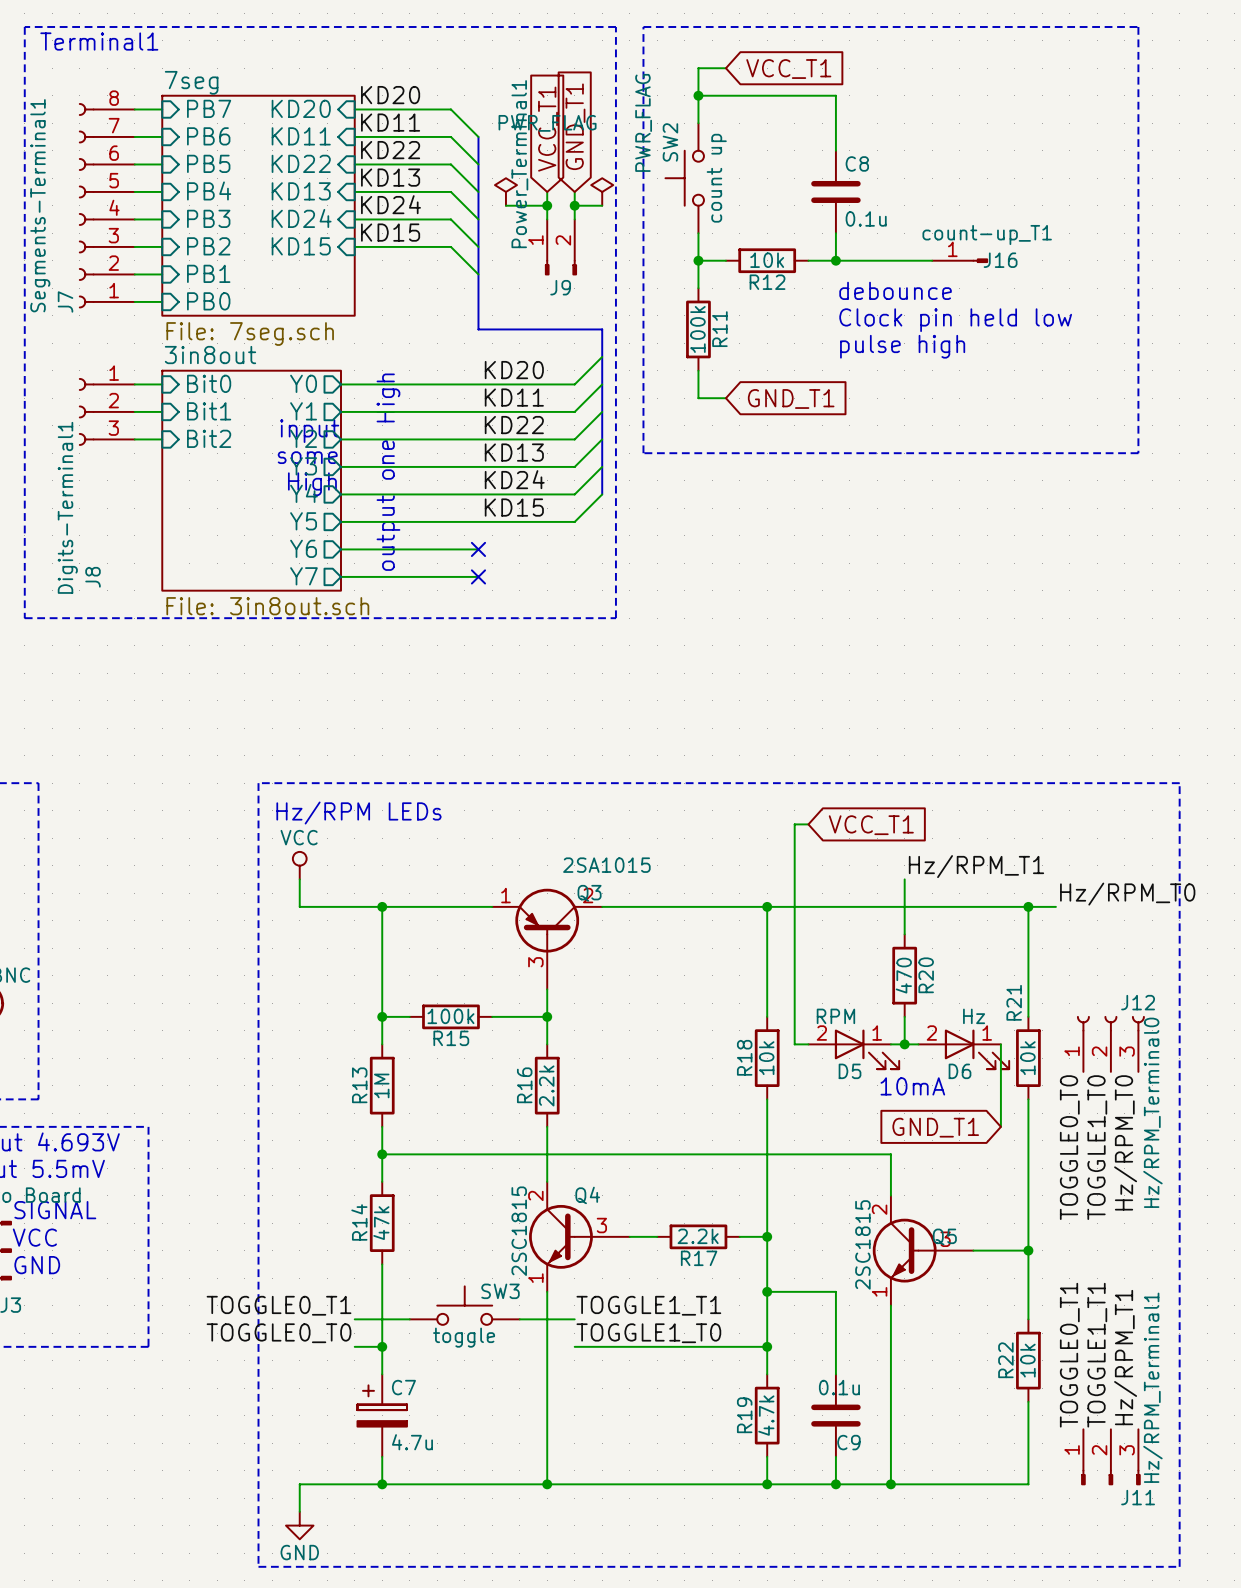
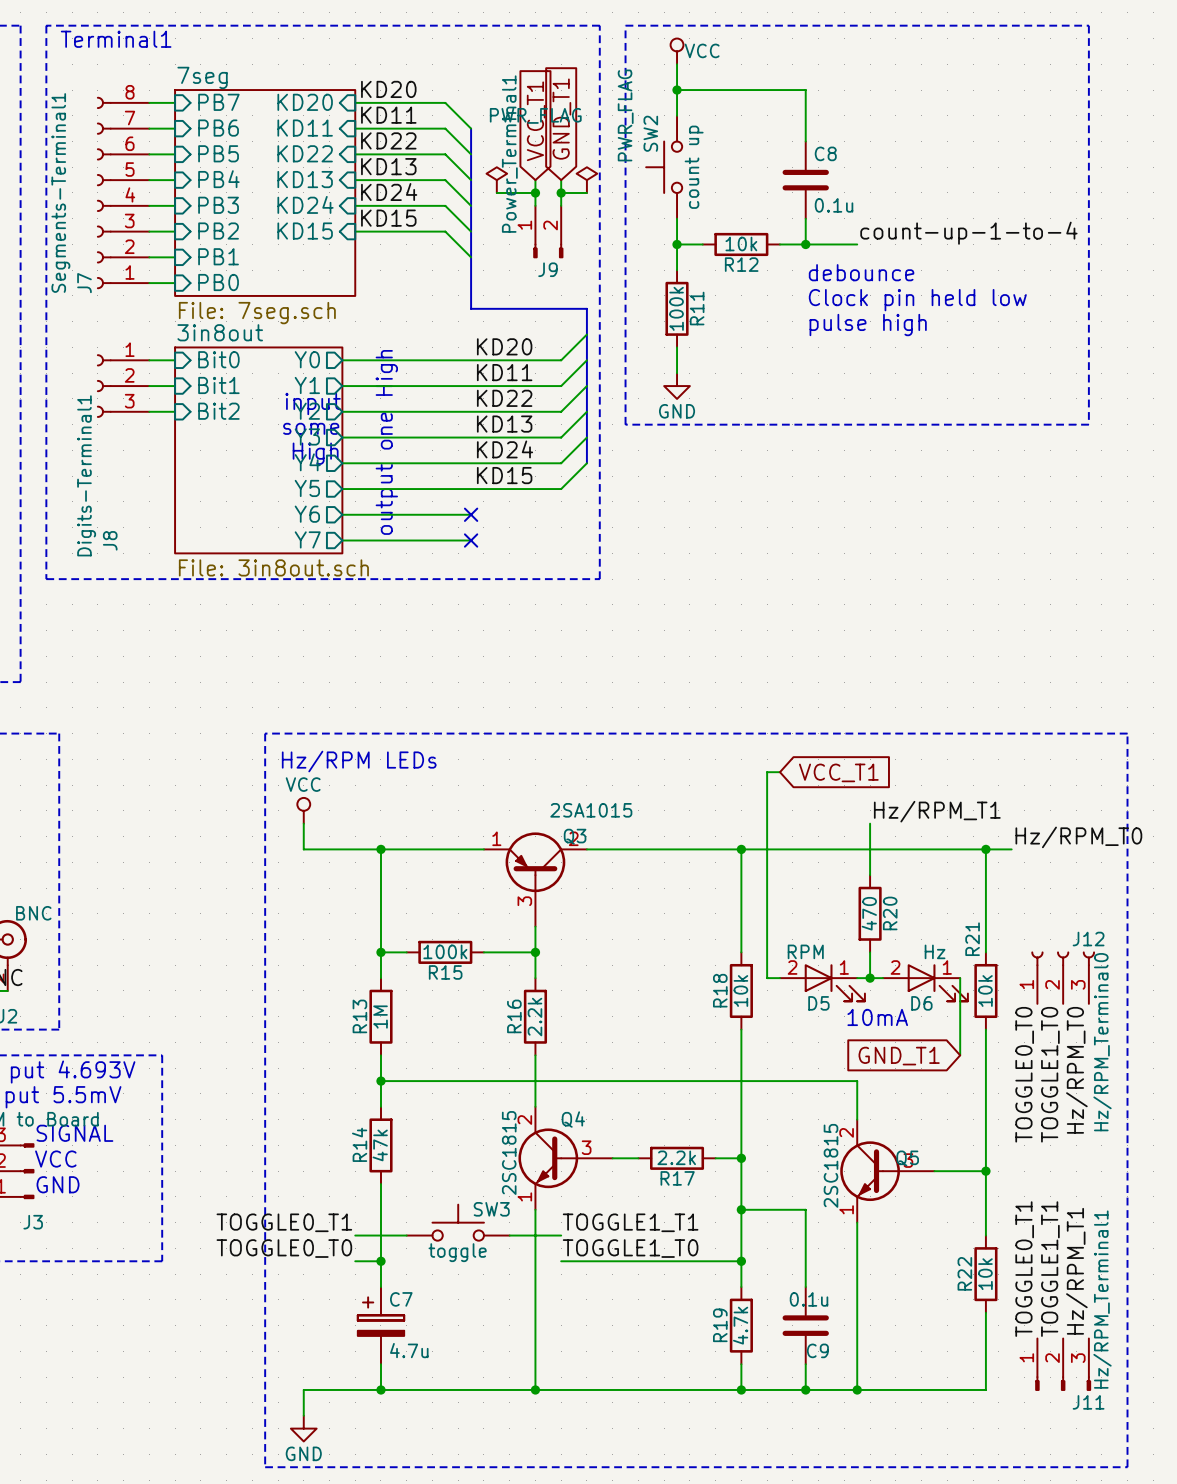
power symbol: none -> VCC (677, 51)
wire: (698, 68) (725, 68) -> none
global label: VCC_T1 (788, 69) -> none
label: none -> count-up-1-to-4 (968, 233)
wire: (890, 260) (932, 260) -> none
J16: count-up_T1 (960, 260) -> none
wire: (698, 398) (725, 398) -> none
global label: GND_T1 (791, 398) -> none
power symbol: none -> GND (677, 386)

